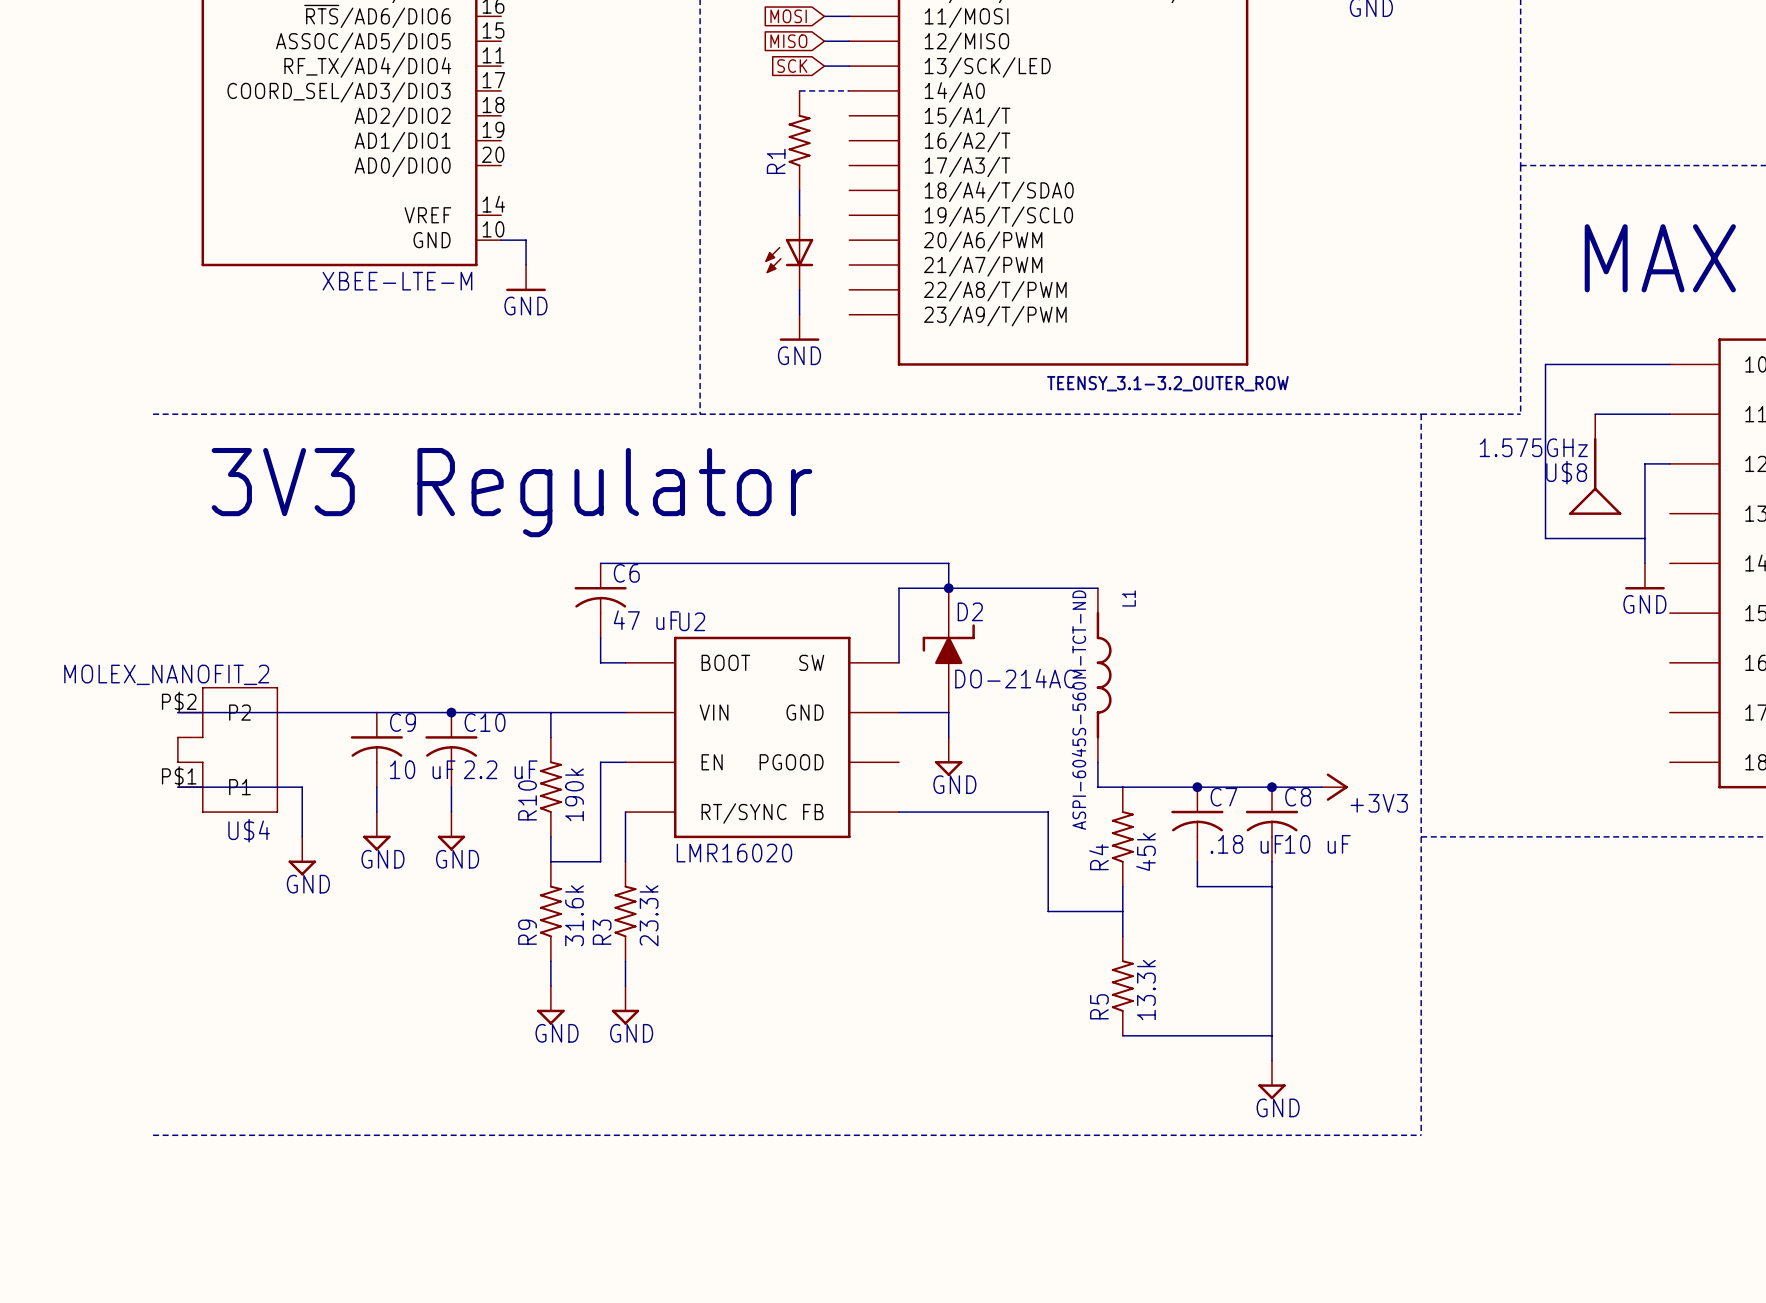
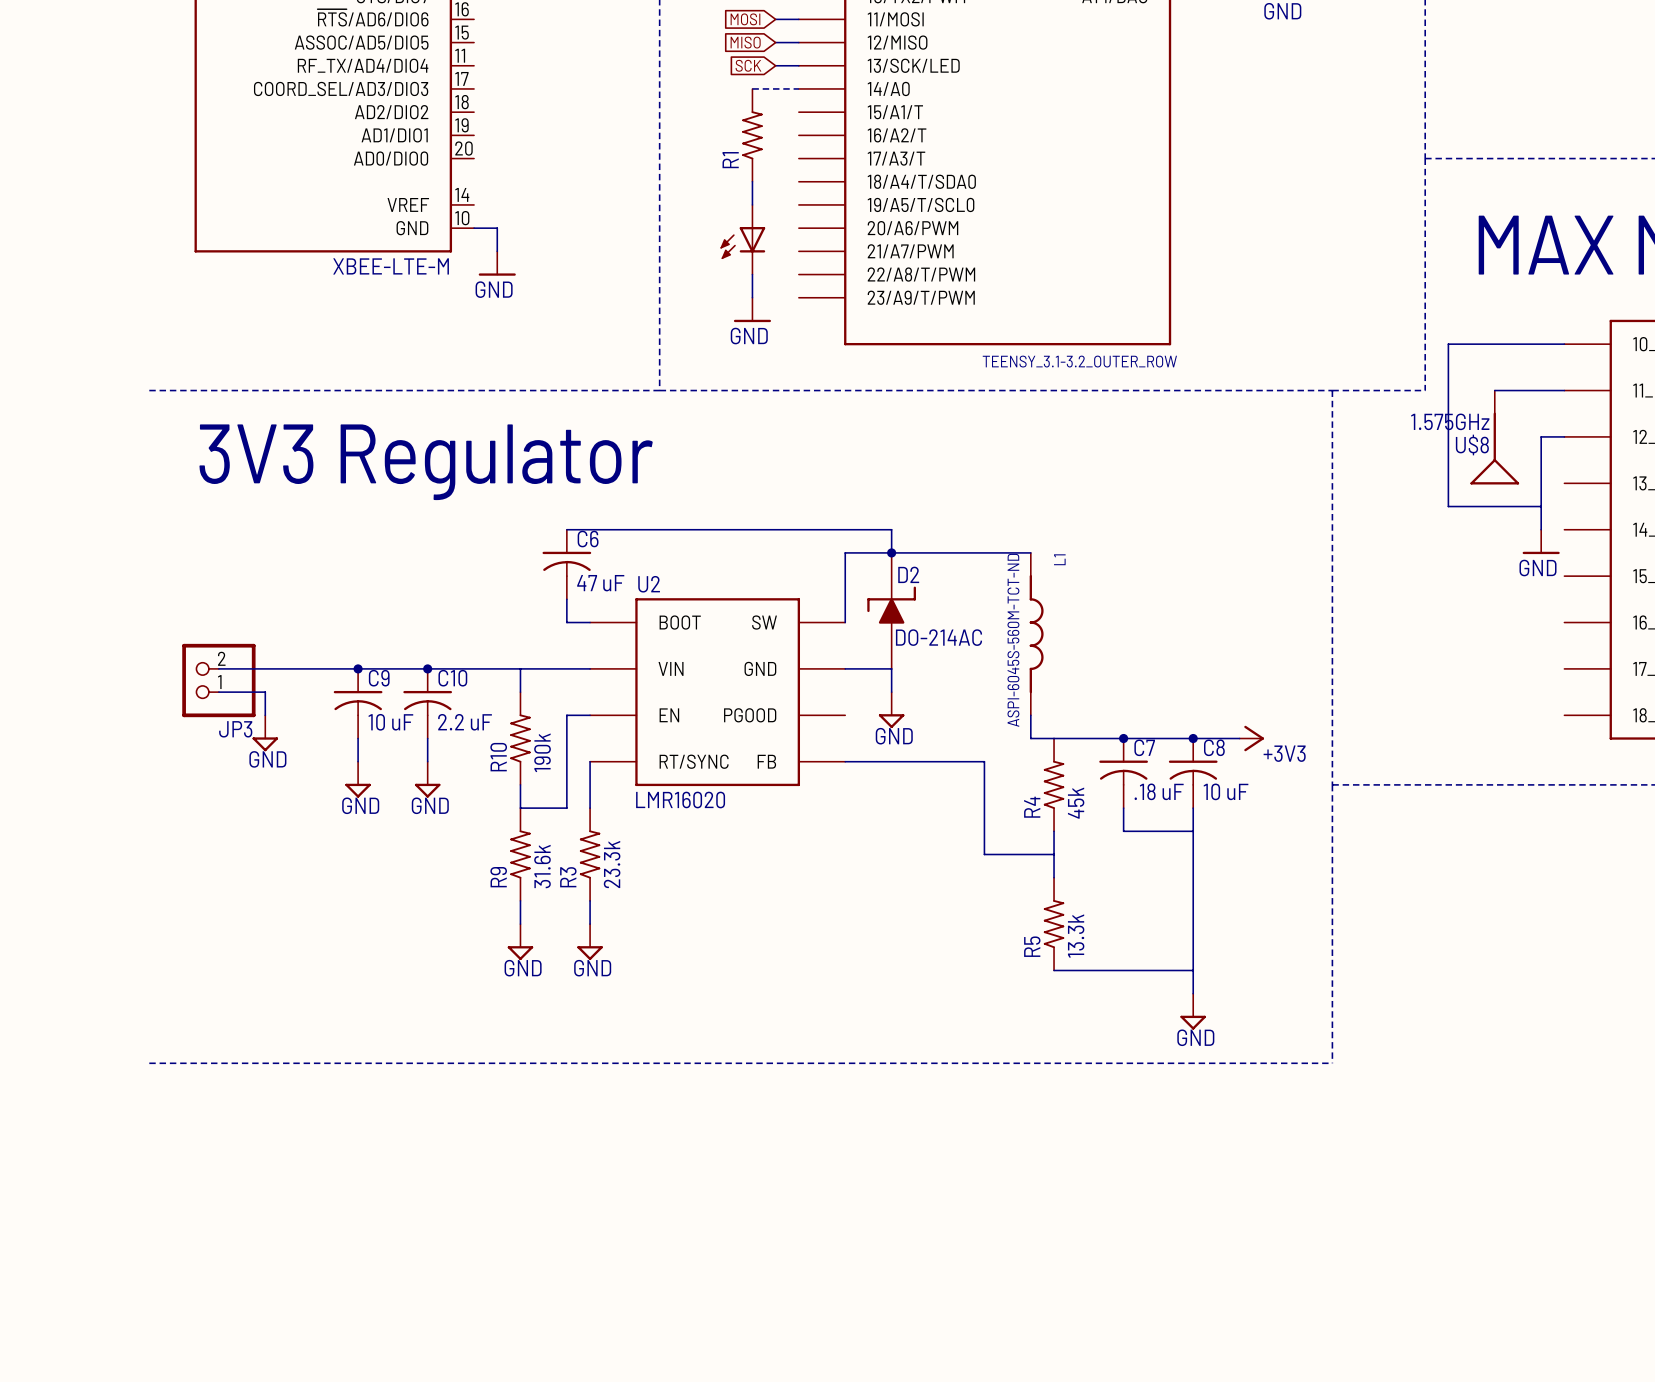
wire: (177, 712) (227, 712) -> none
junction: none -> (358, 668)
JP3: none -> (218, 680)
wire: none -> (218, 692) (265, 692) (265, 715)
U$4: MOLEX_NANOFIT_2 (227, 749) -> none
wire: (177, 787) (302, 787) (302, 836) -> none
power symbol position: GND (302, 856) -> GND (265, 733)

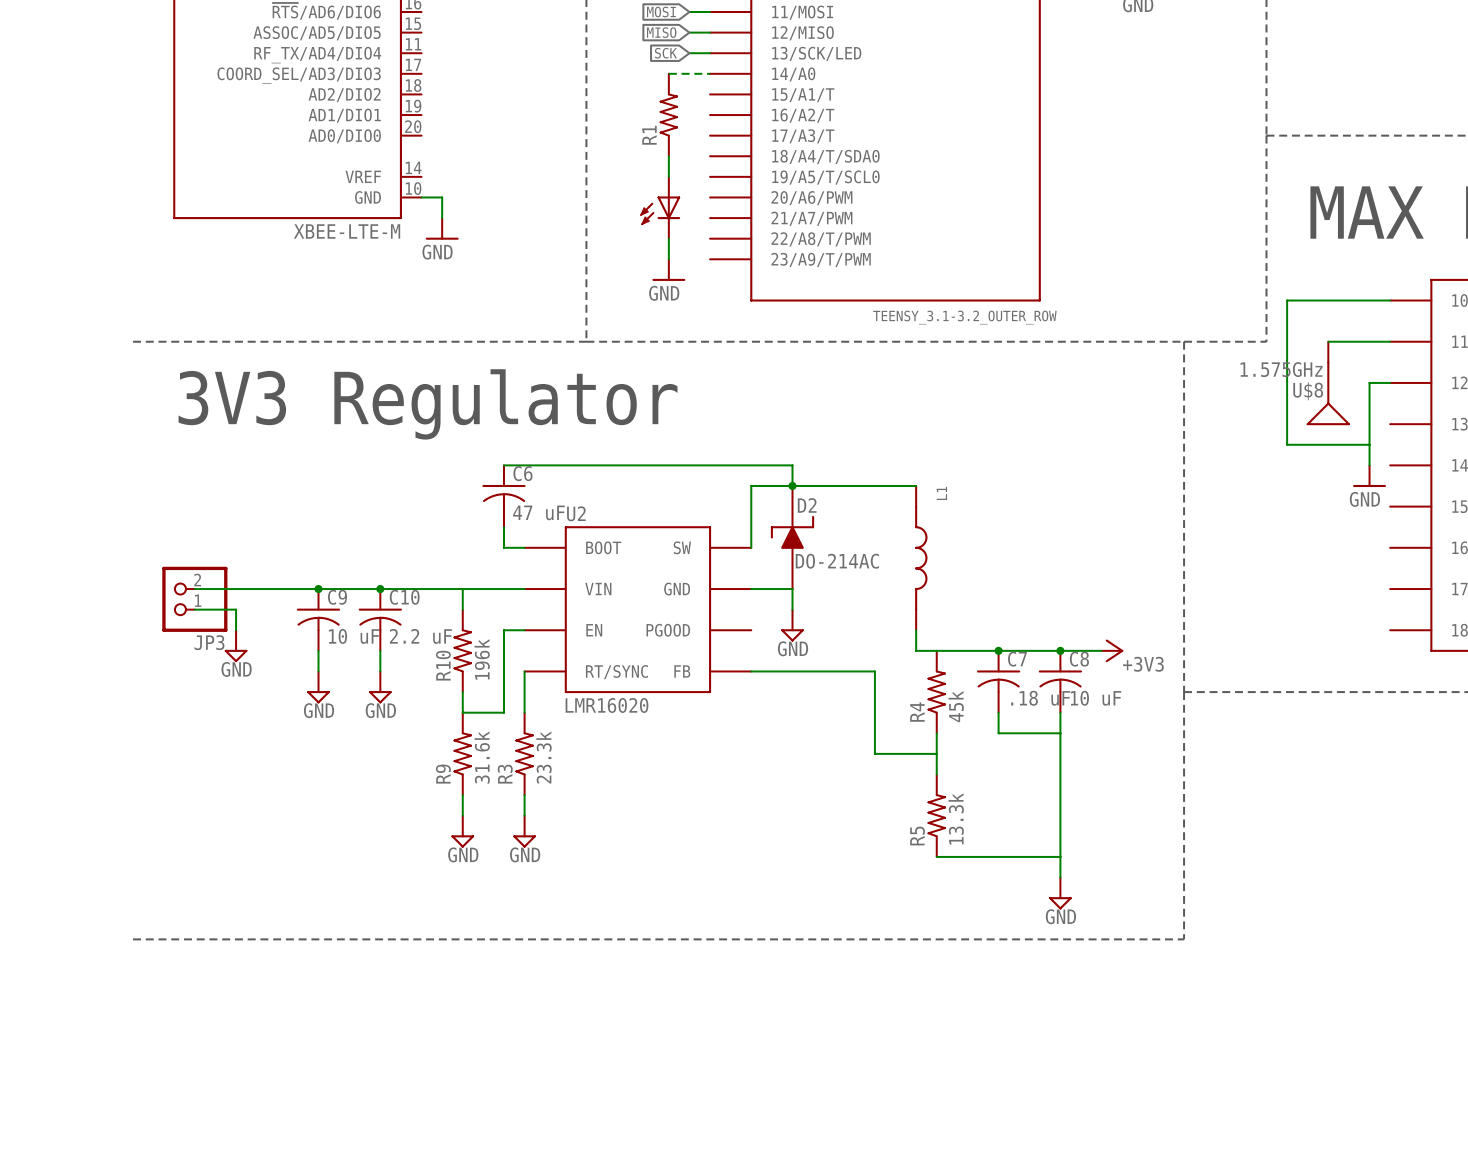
L1 value: ASPI-6045S-560M-TCT-ND (1013, 640) -> none
R10 value: 190k (542, 752) -> 196k (482, 659)

